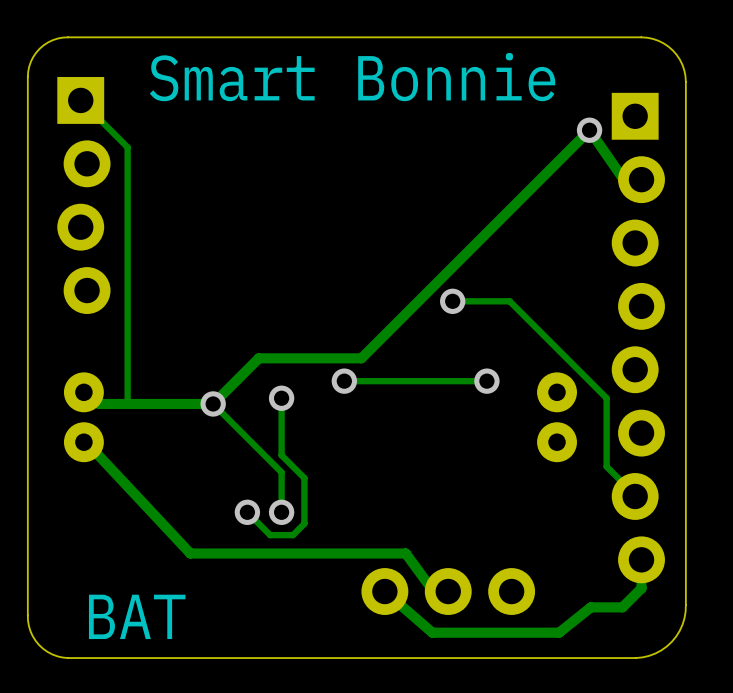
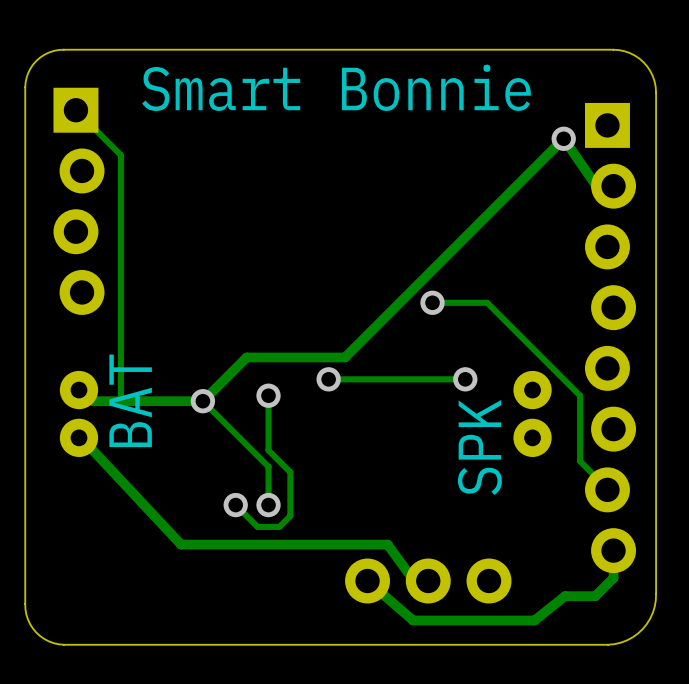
text: none -> SPK (479, 447)
text rotation: 0° (137, 616) -> 90° counterclockwise (130, 400)
text position: BAT (137, 616) -> BAT (130, 400)

